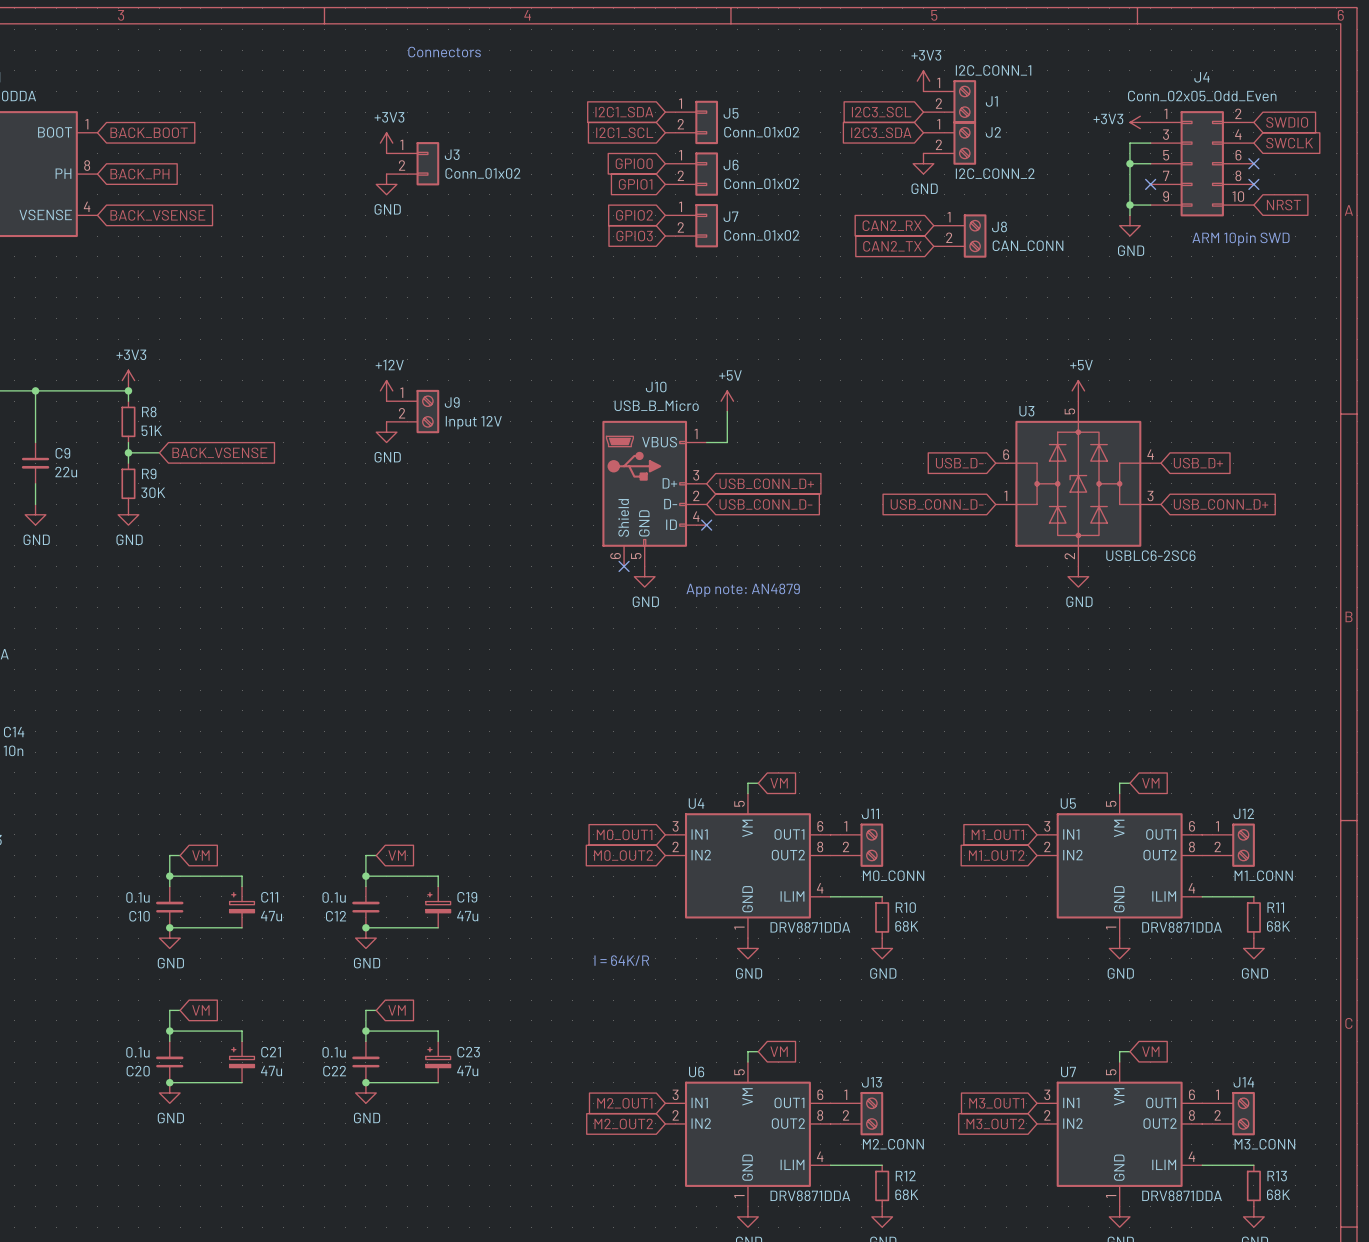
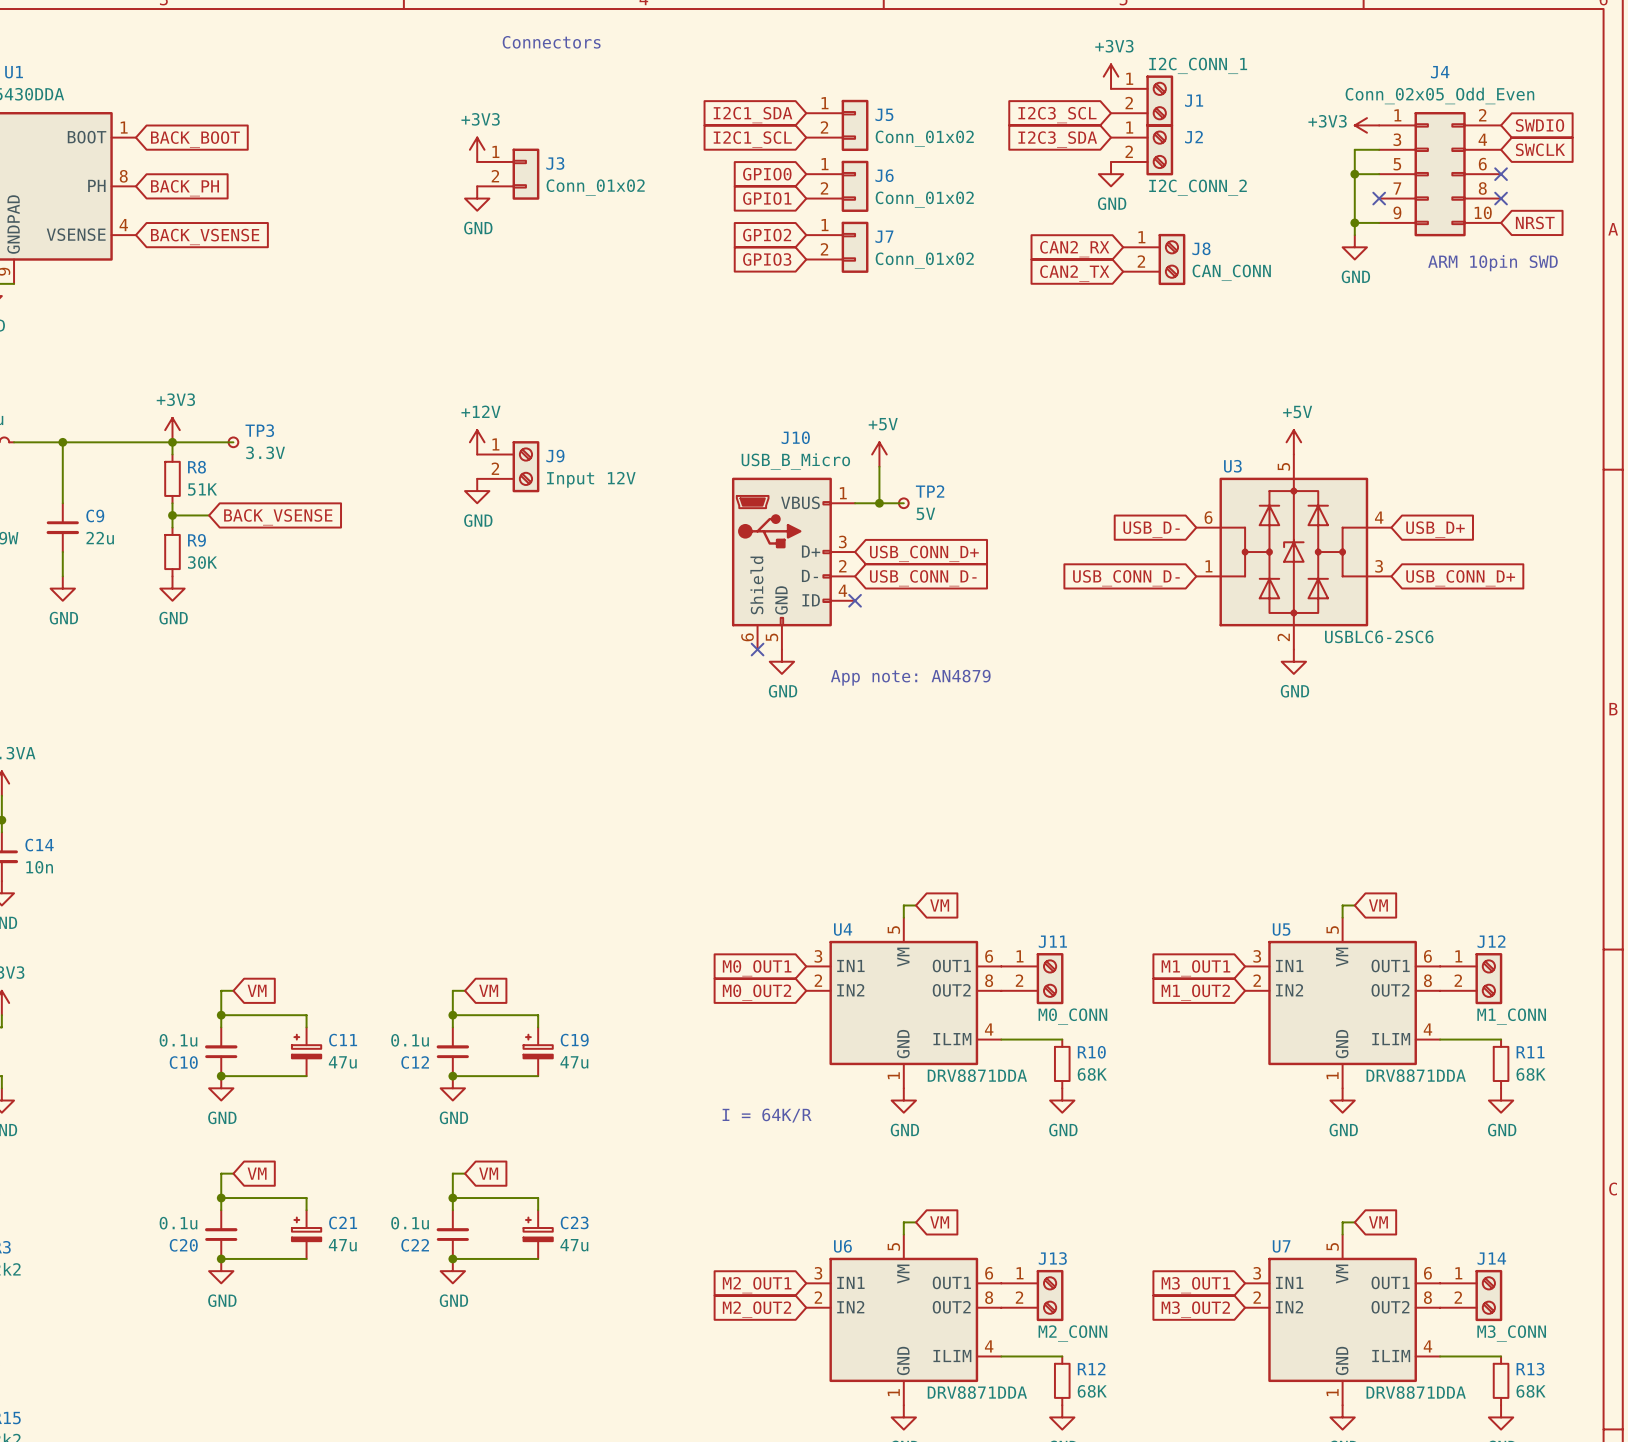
wire: none -> (172, 442) (233, 442)
TP3: none -> 3.3V (233, 442)
wire: none -> (879, 503) (903, 503)
junction: none -> (879, 503)
TP2: none -> 5V (903, 503)

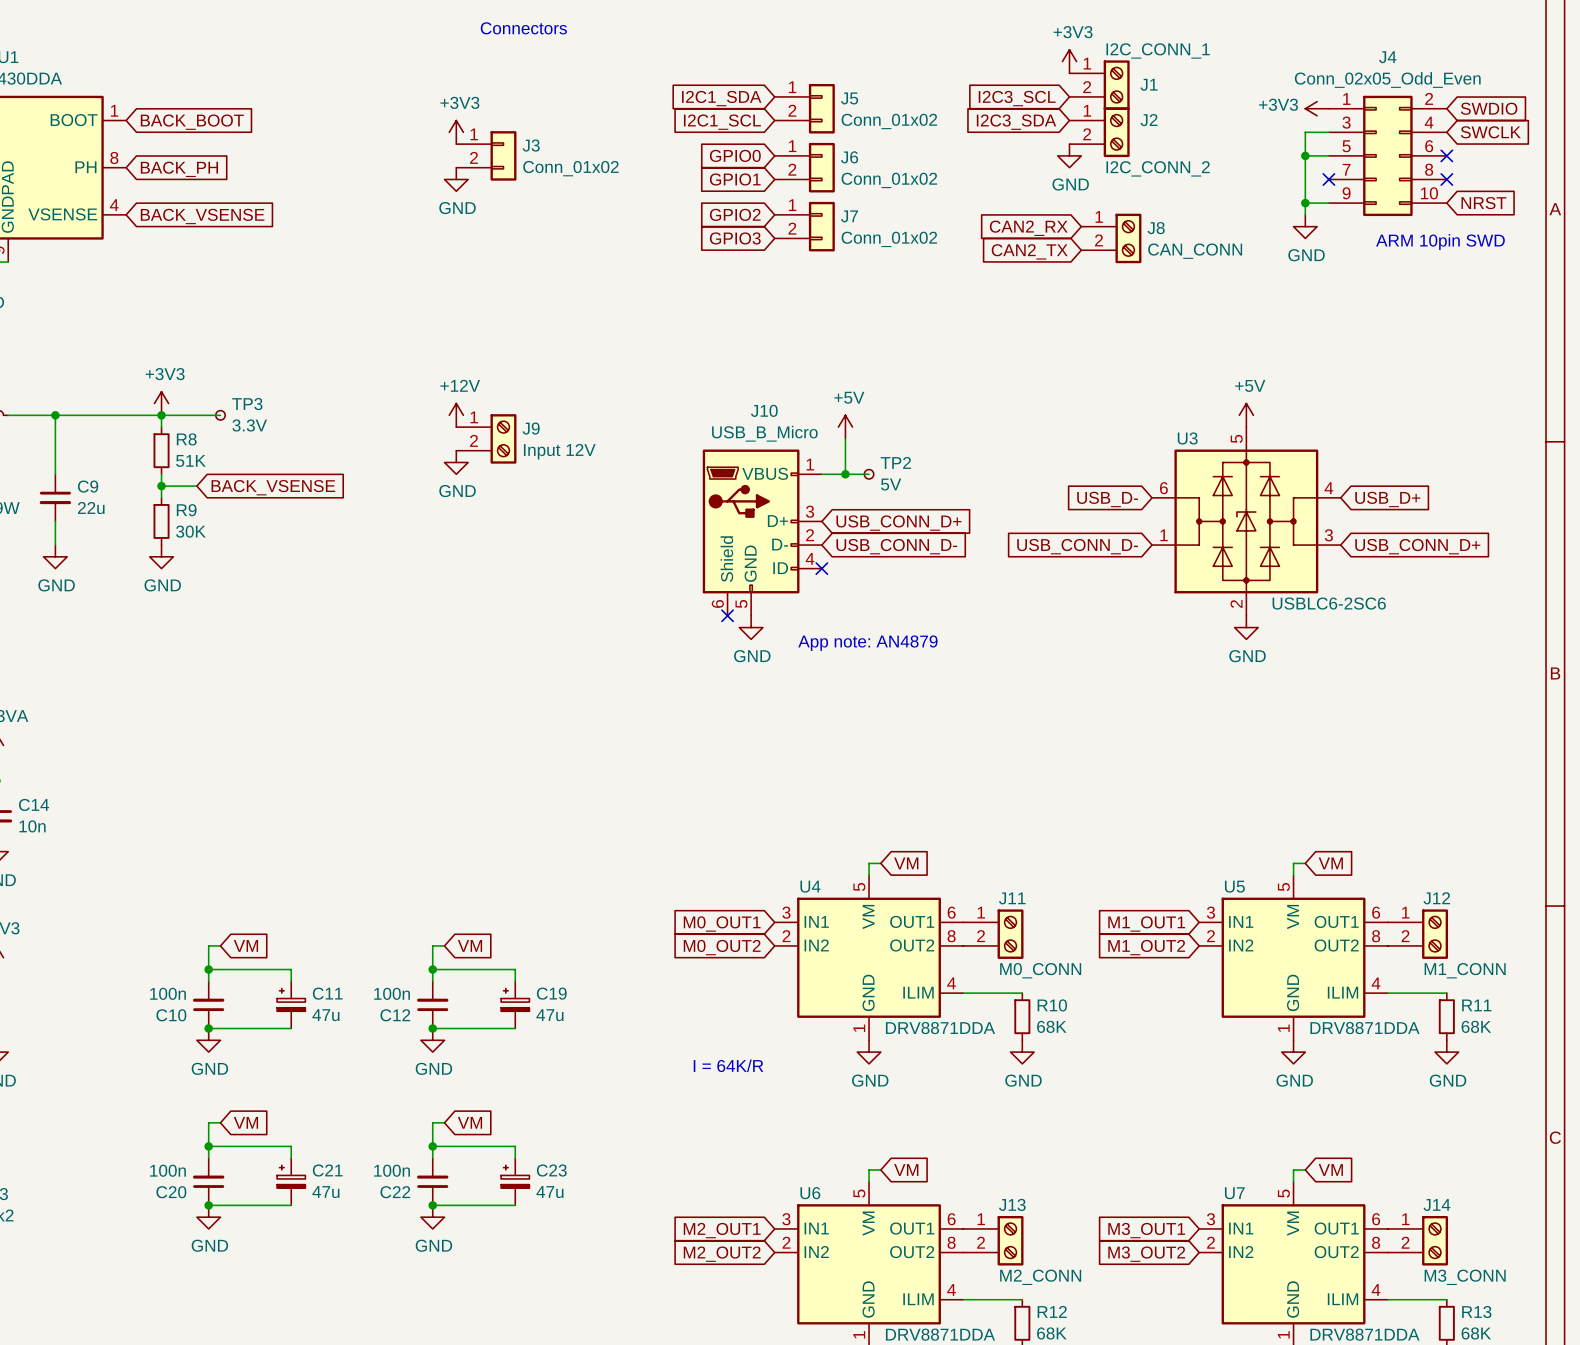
C10 value: 0.1u (178, 1040) -> 100n (168, 993)
C12 value: 0.1u (410, 1040) -> 100n (392, 993)
C20 value: 0.1u (178, 1223) -> 100n (168, 1170)
C22 value: 0.1u (410, 1223) -> 100n (392, 1170)

